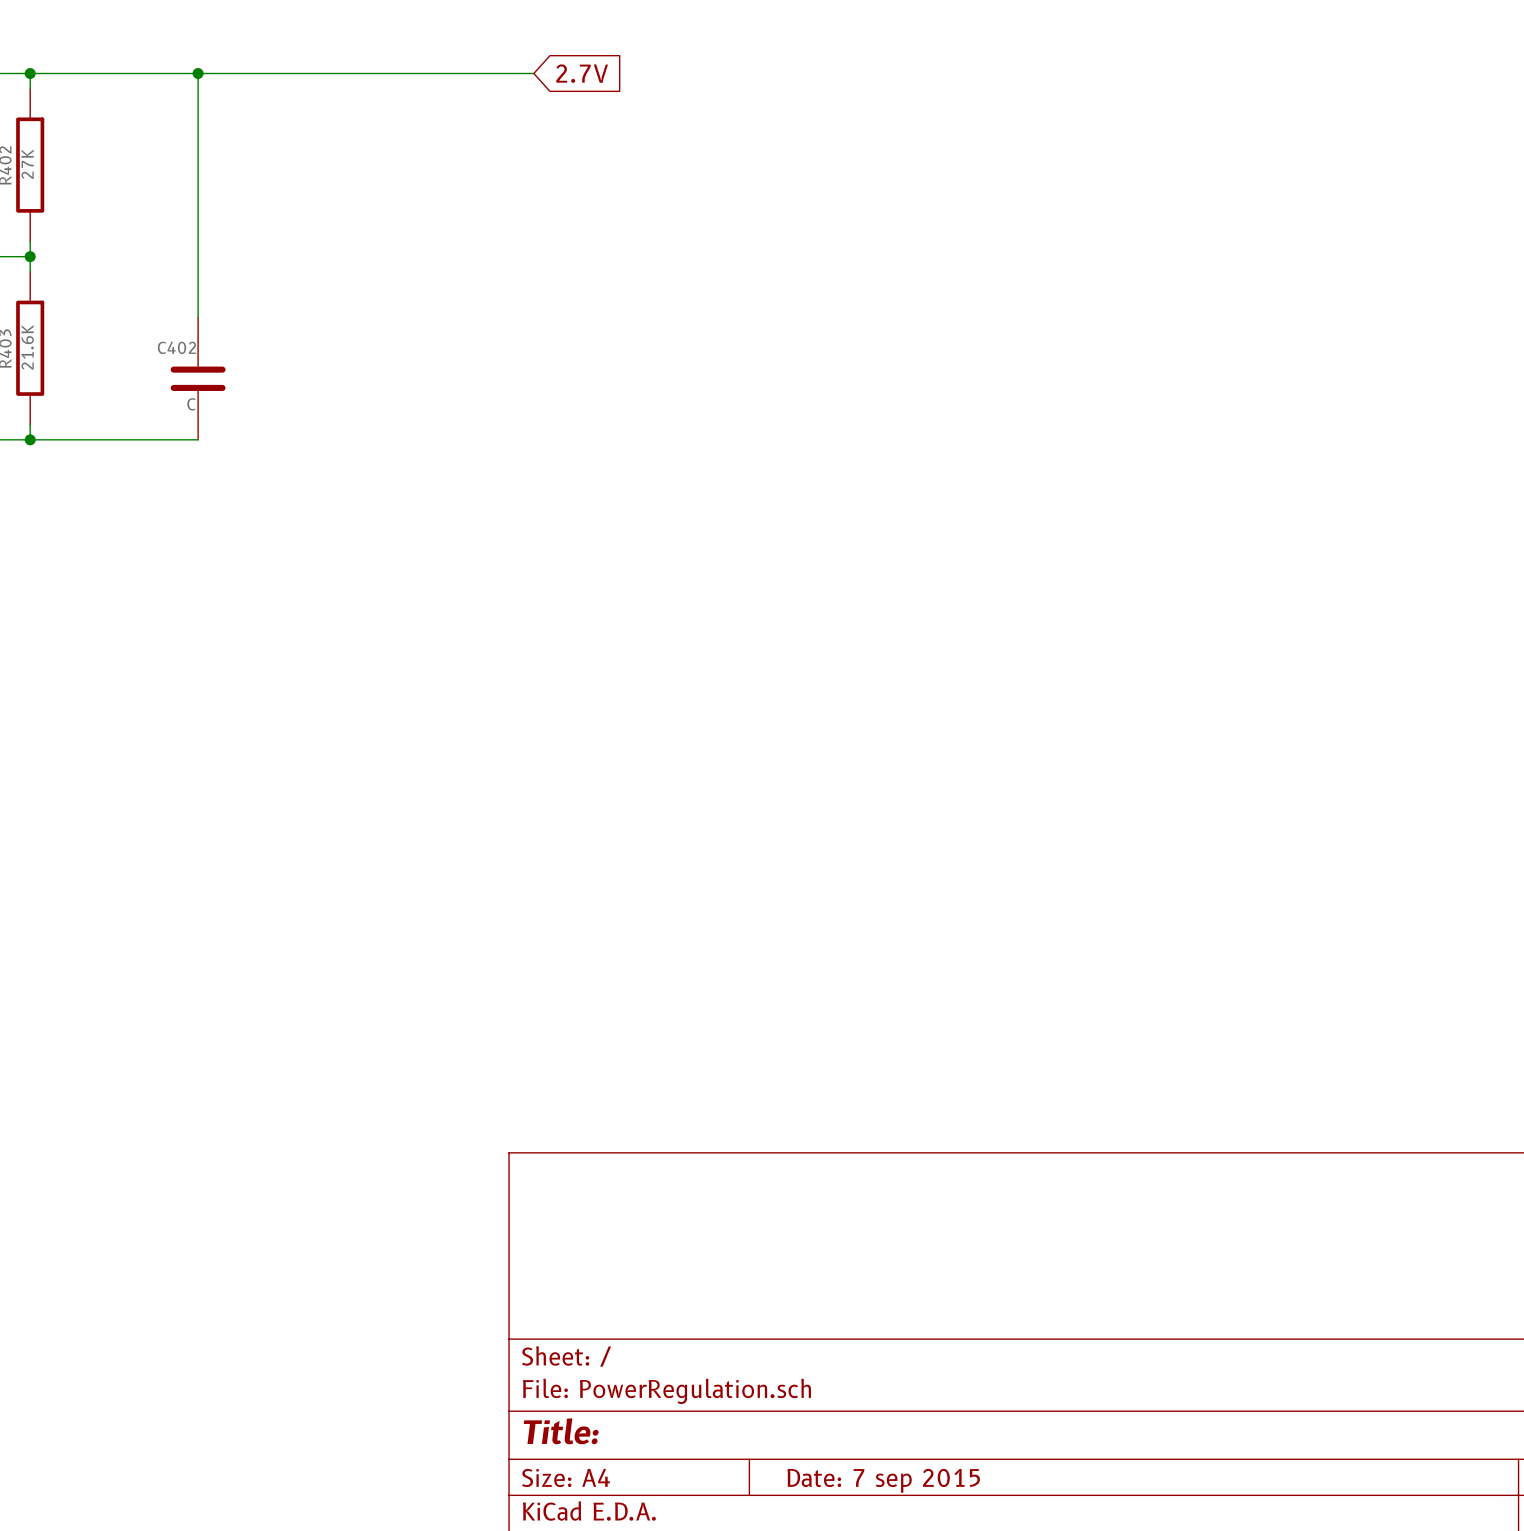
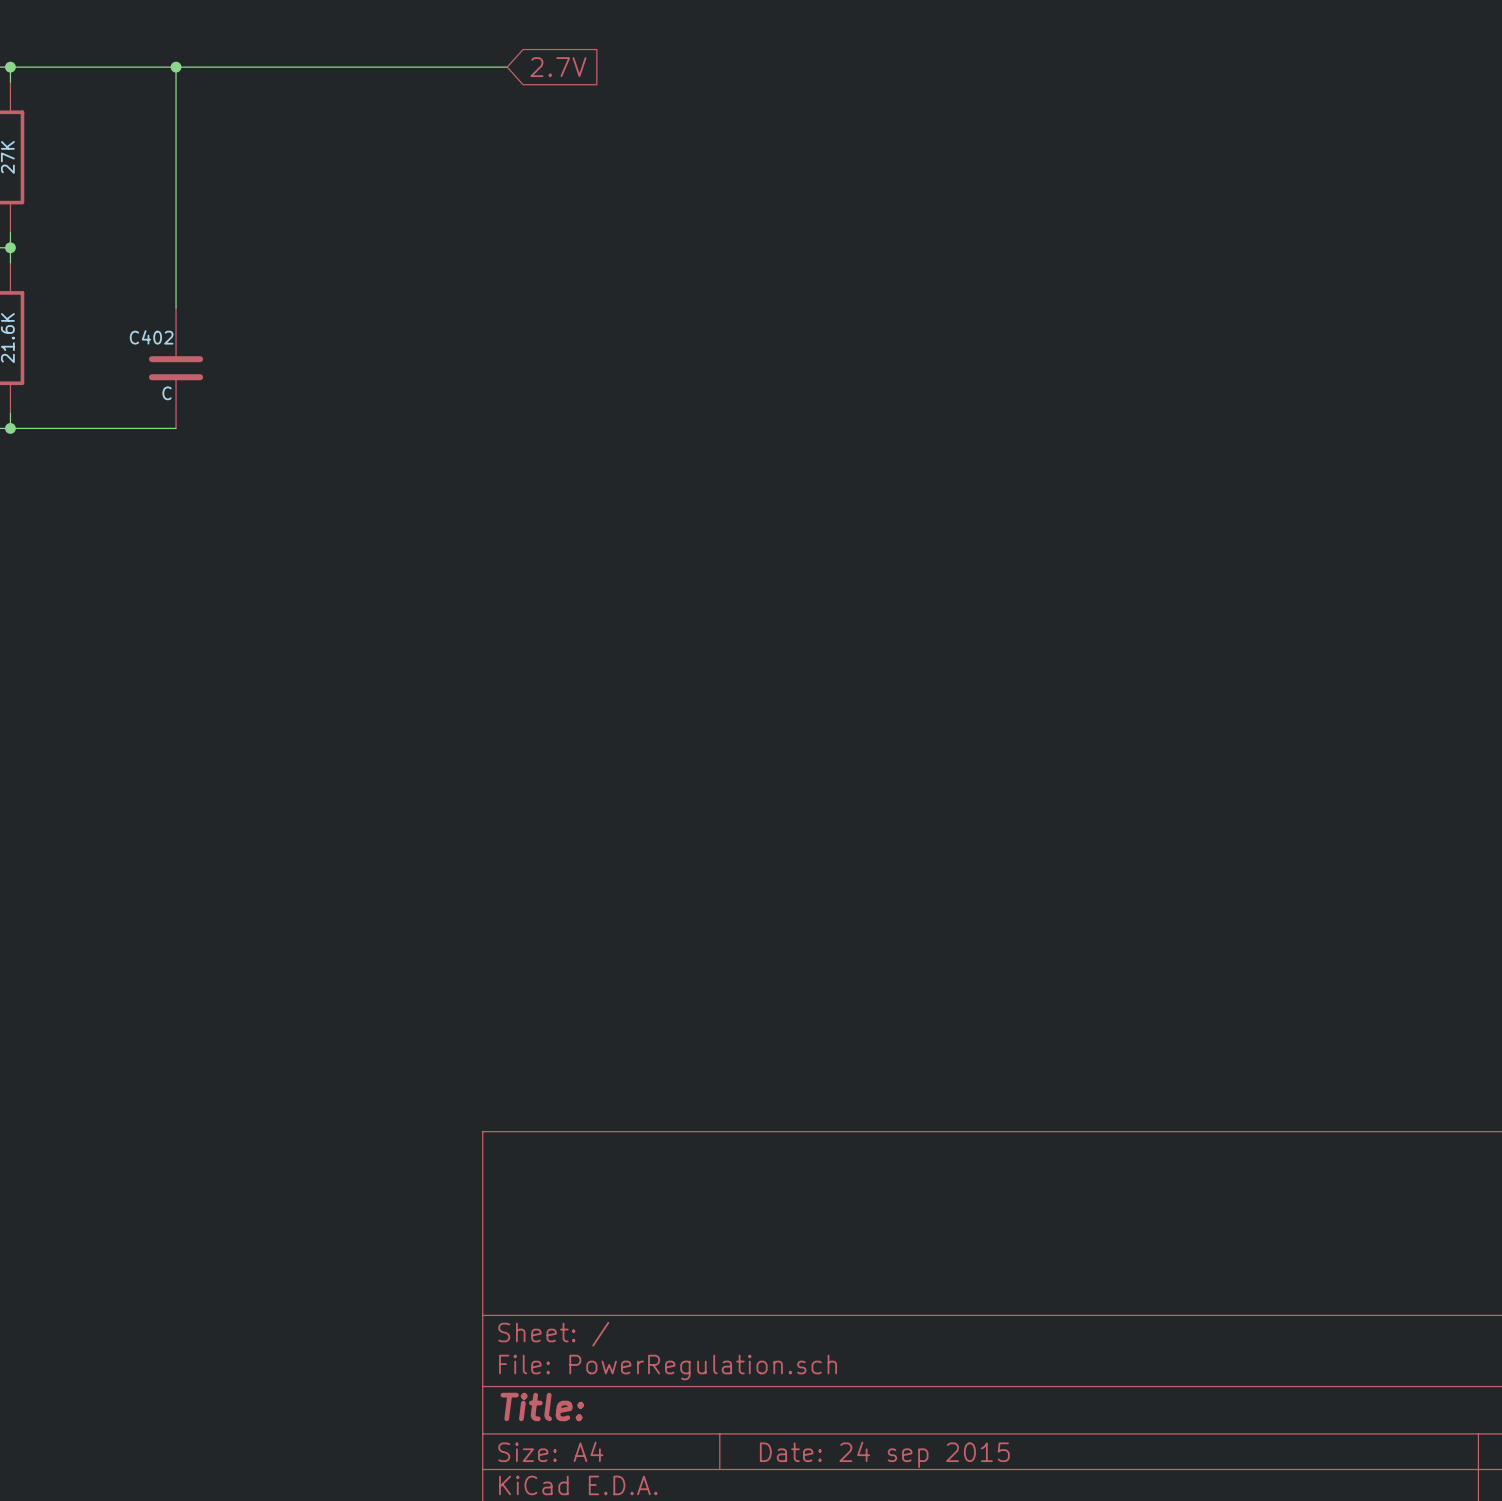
title block: Date: 7 sep 2015 (883, 1480) -> Date: 24 sep 2015 (884, 1454)

